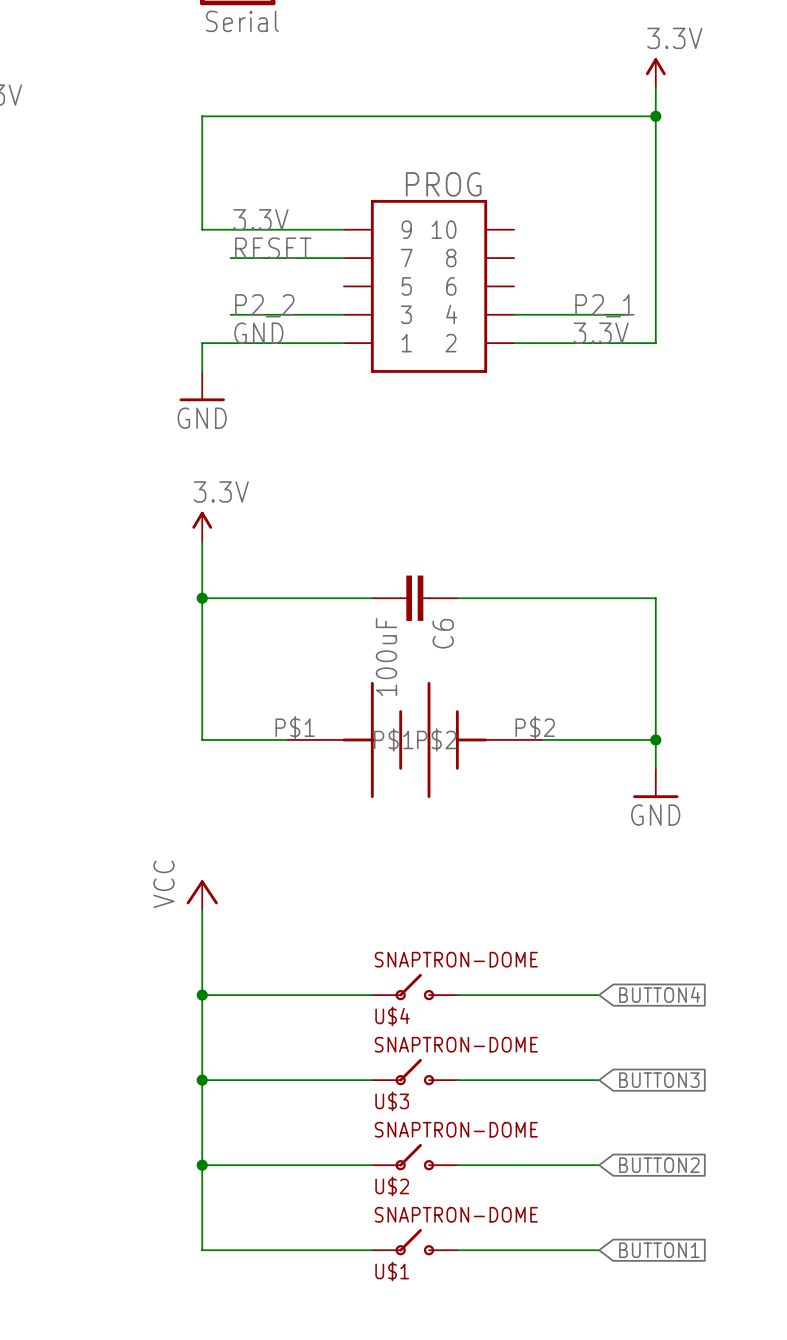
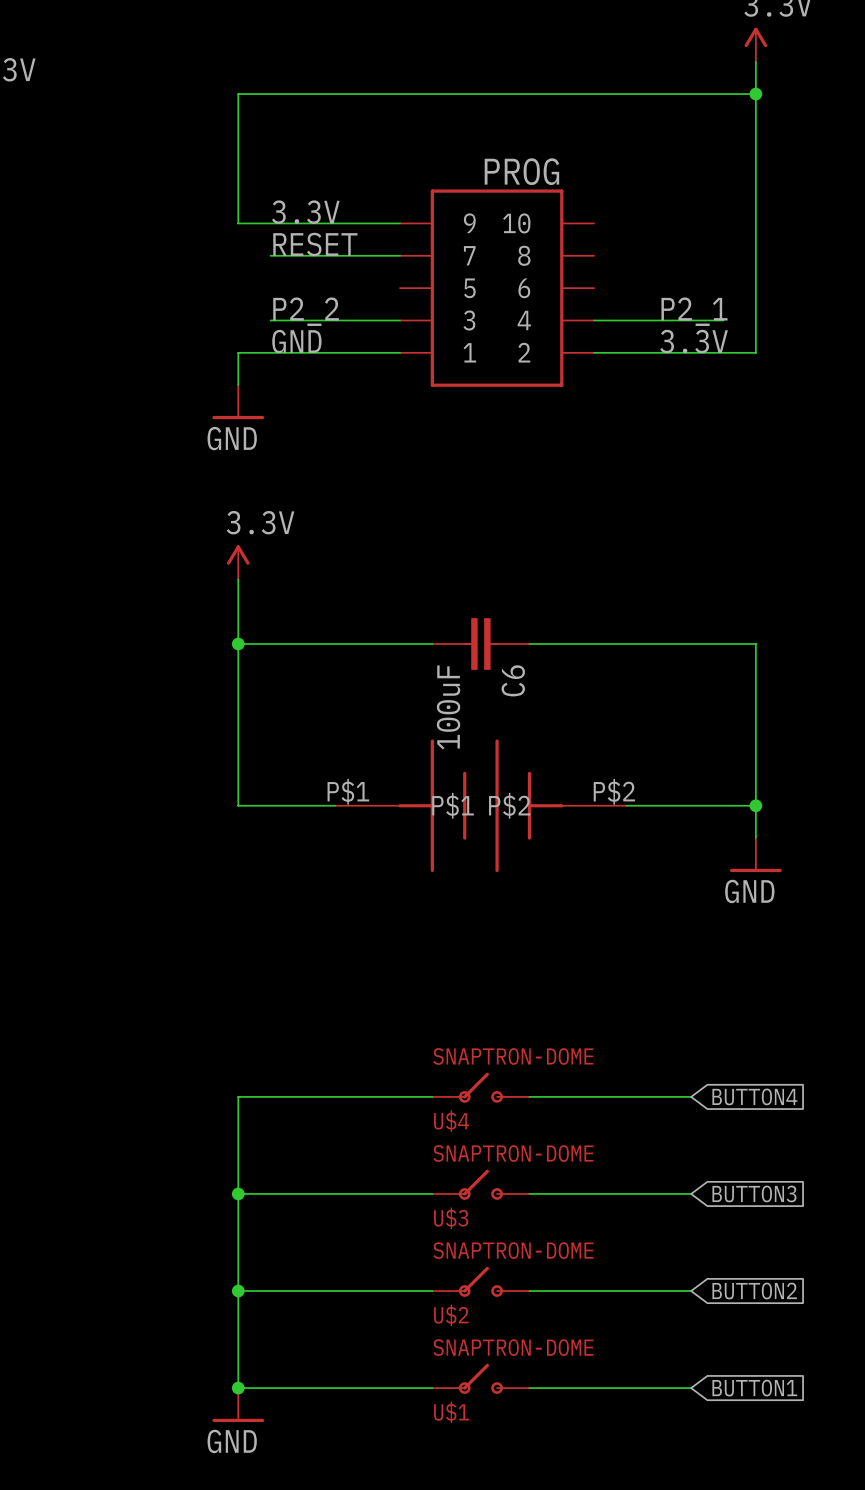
power symbol: VCC (202, 895) -> none
wire: (202, 910) (202, 995) -> none
junction: (202, 995) -> none
junction: none -> (238, 1388)
power symbol: none -> GND (238, 1405)

